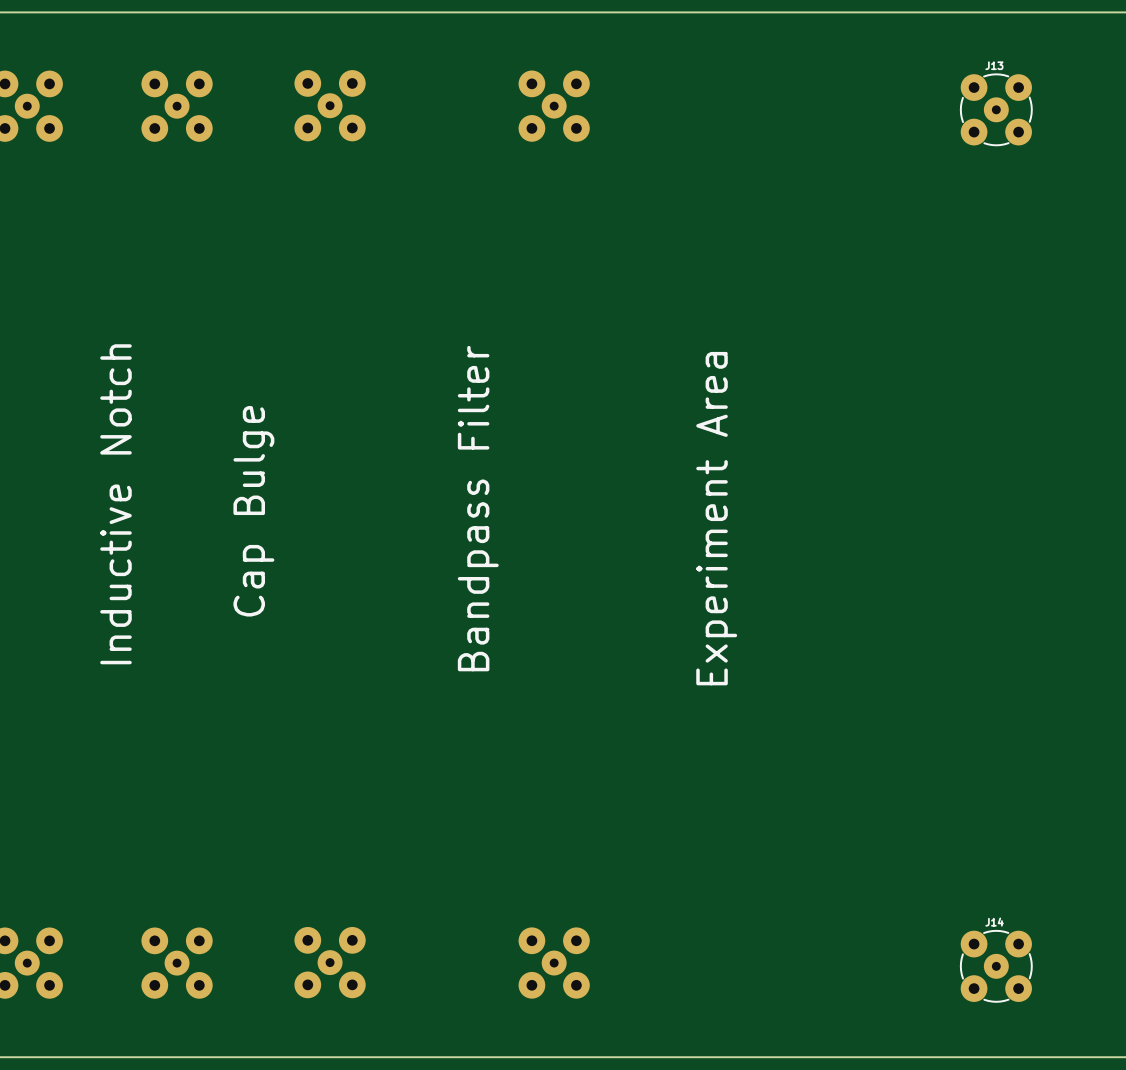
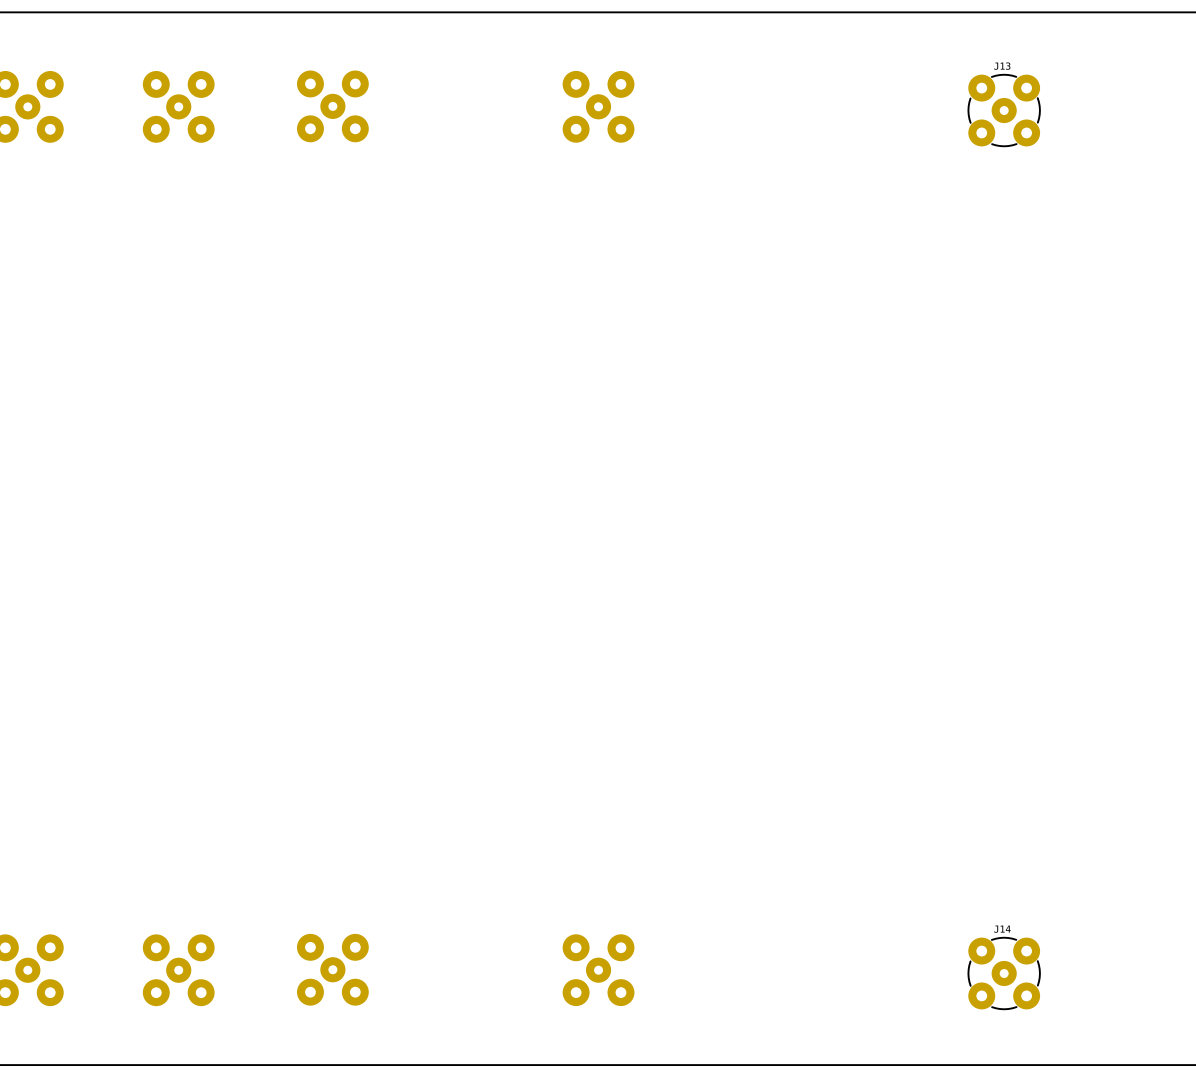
part position: (554, 106) -> (598, 106)
text: Inductive Notch (115, 504) -> none
text: Bandpass Filter (478, 508) -> none
text: Cap Bulge (253, 511) -> none
text: Experiment Area (716, 518) -> none
part position: (554, 963) -> (598, 970)

